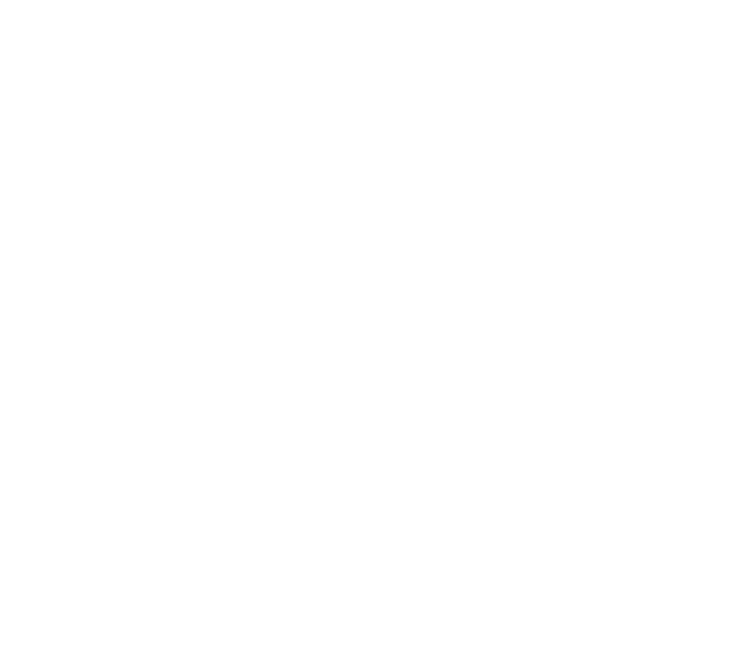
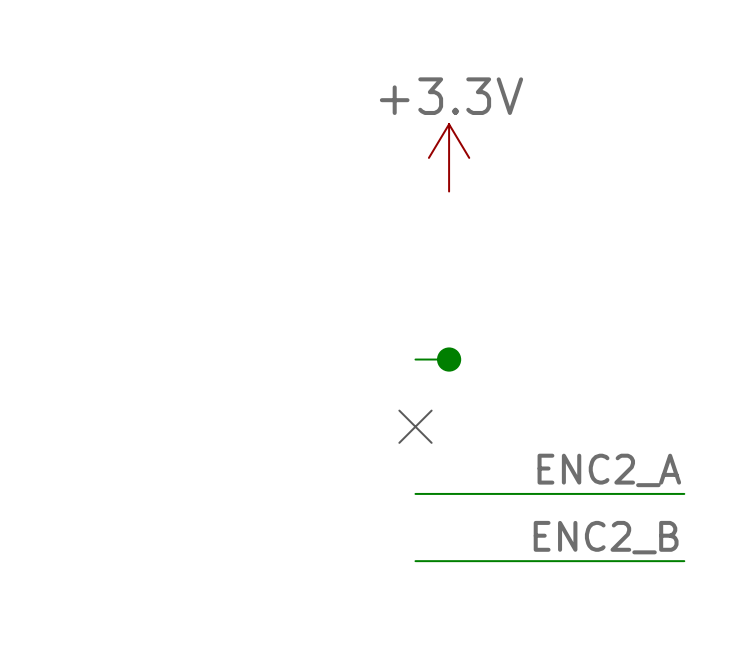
power symbol: none -> +3.3V (449, 157)
wire: none -> (415, 359) (449, 359)
junction: none -> (449, 359)
no-connect mark: none -> (415, 426)
label: none -> ENC2_A (609, 470)
wire: none -> (415, 493) (684, 493)
label: none -> ENC2_B (606, 537)
wire: none -> (415, 561) (684, 561)

